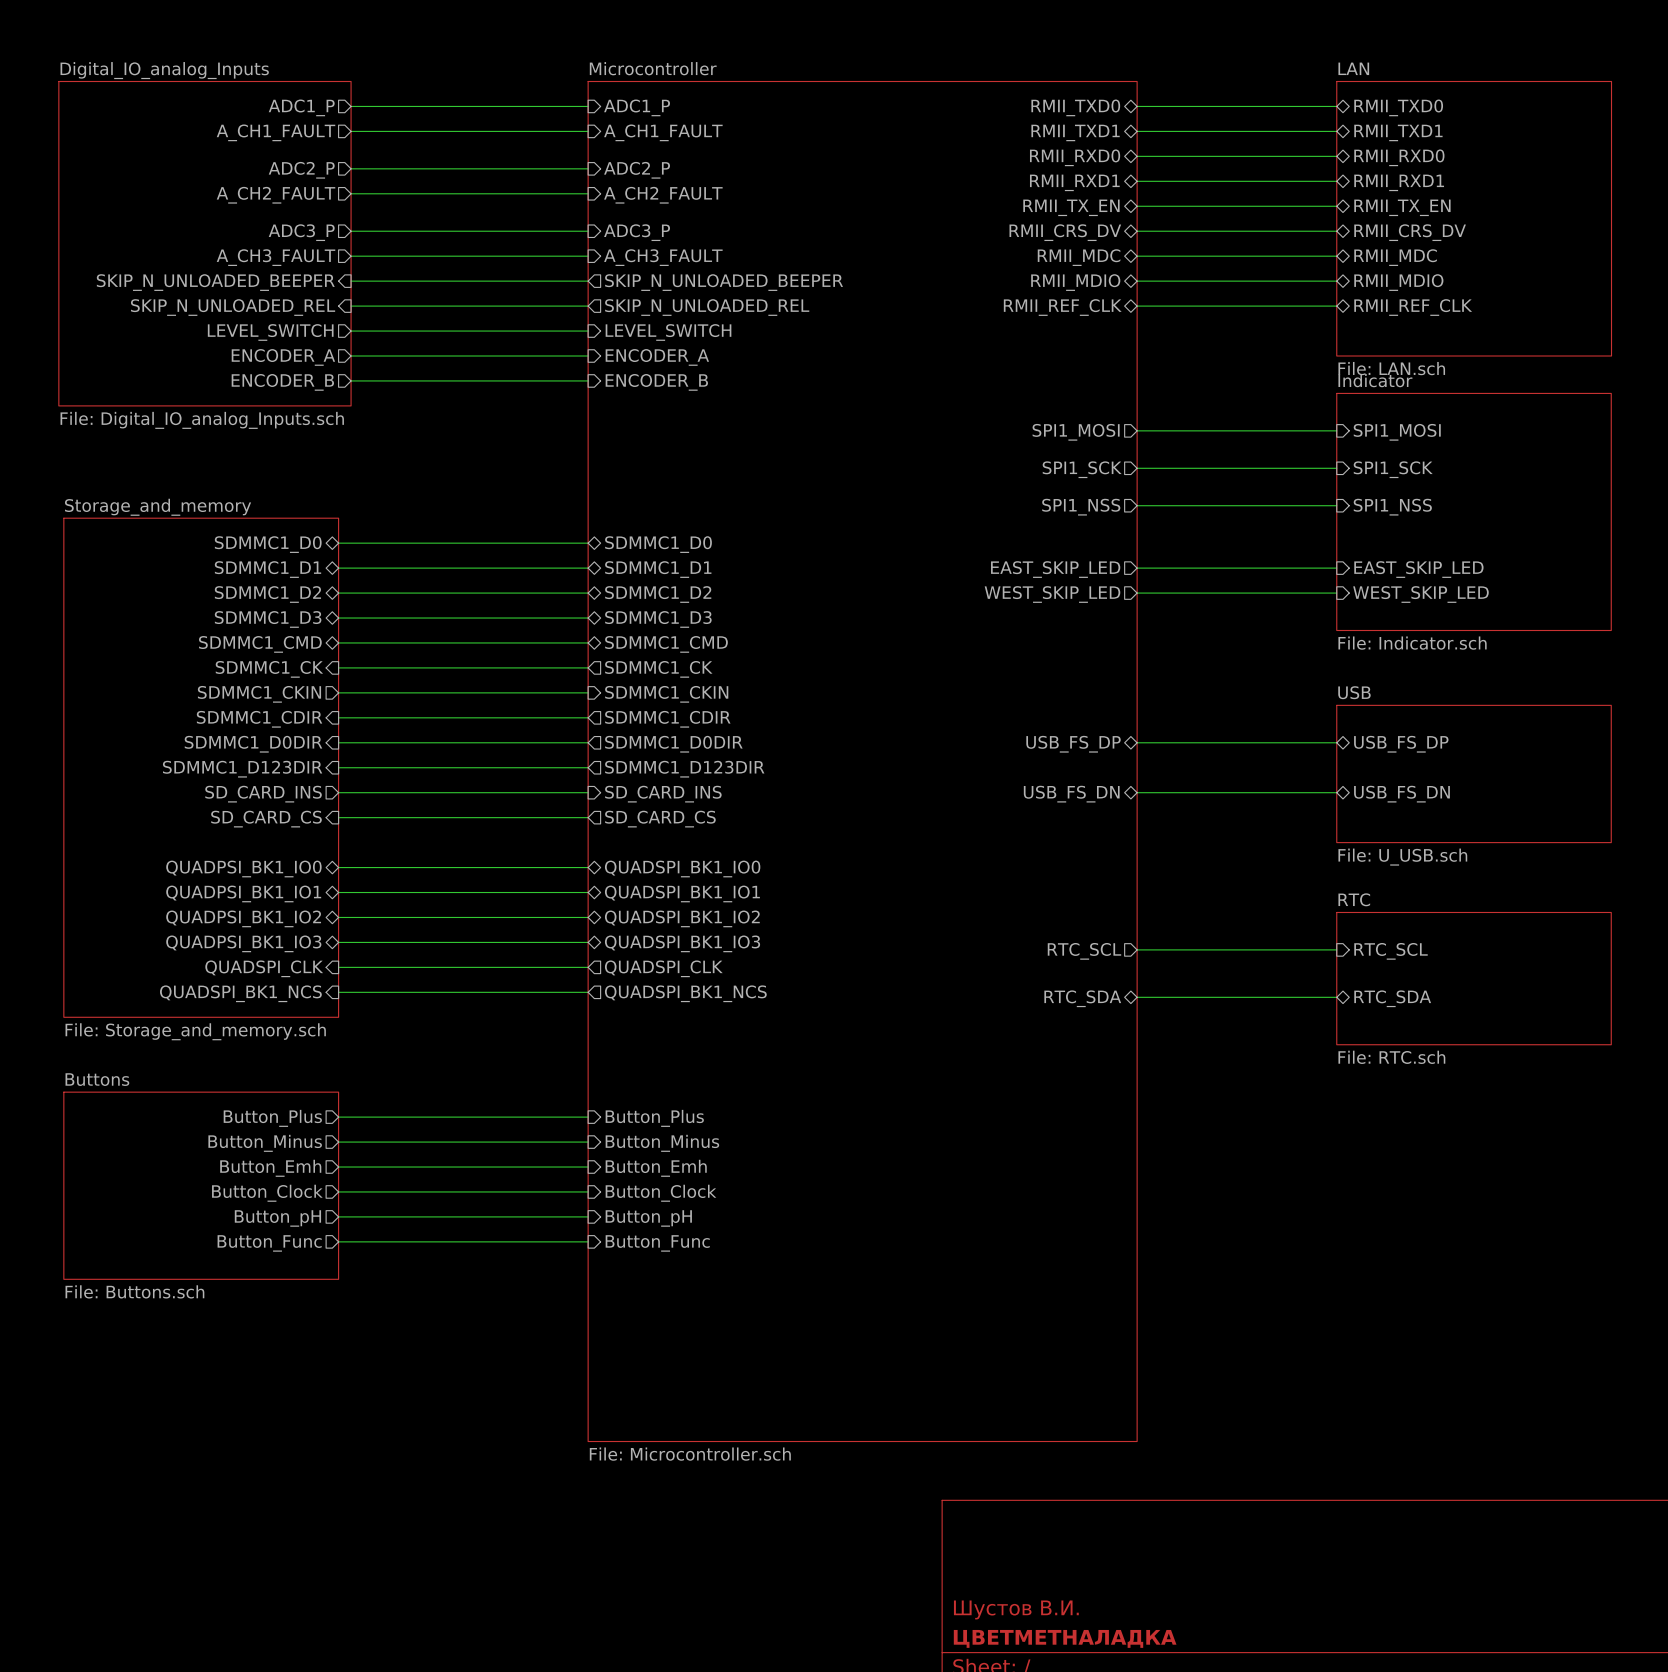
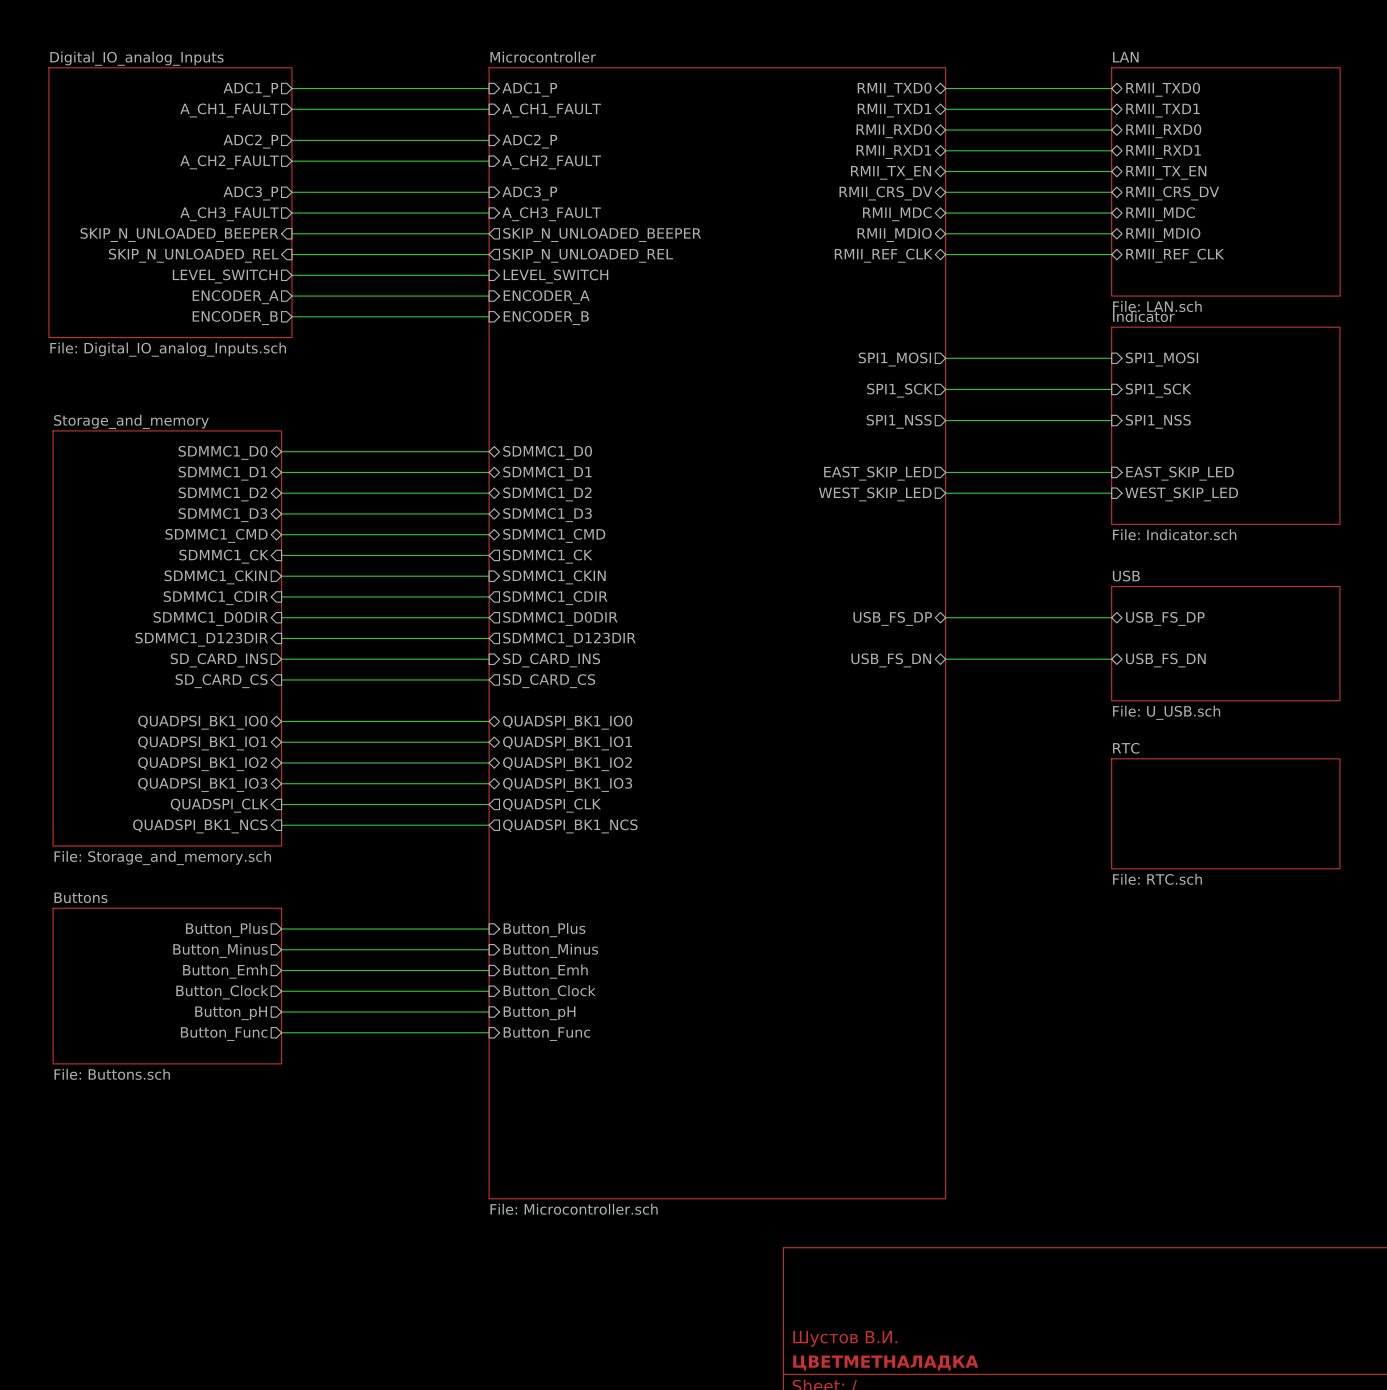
wire: (1137, 949) (1336, 949) -> none
sheet pin: RTC_SCL (1084, 951) -> none
sheet pin: RTC_SCL (1391, 951) -> none
wire: (1137, 997) (1336, 997) -> none
sheet pin: RTC_SDA (1082, 998) -> none
sheet pin: RTC_SDA (1392, 998) -> none

